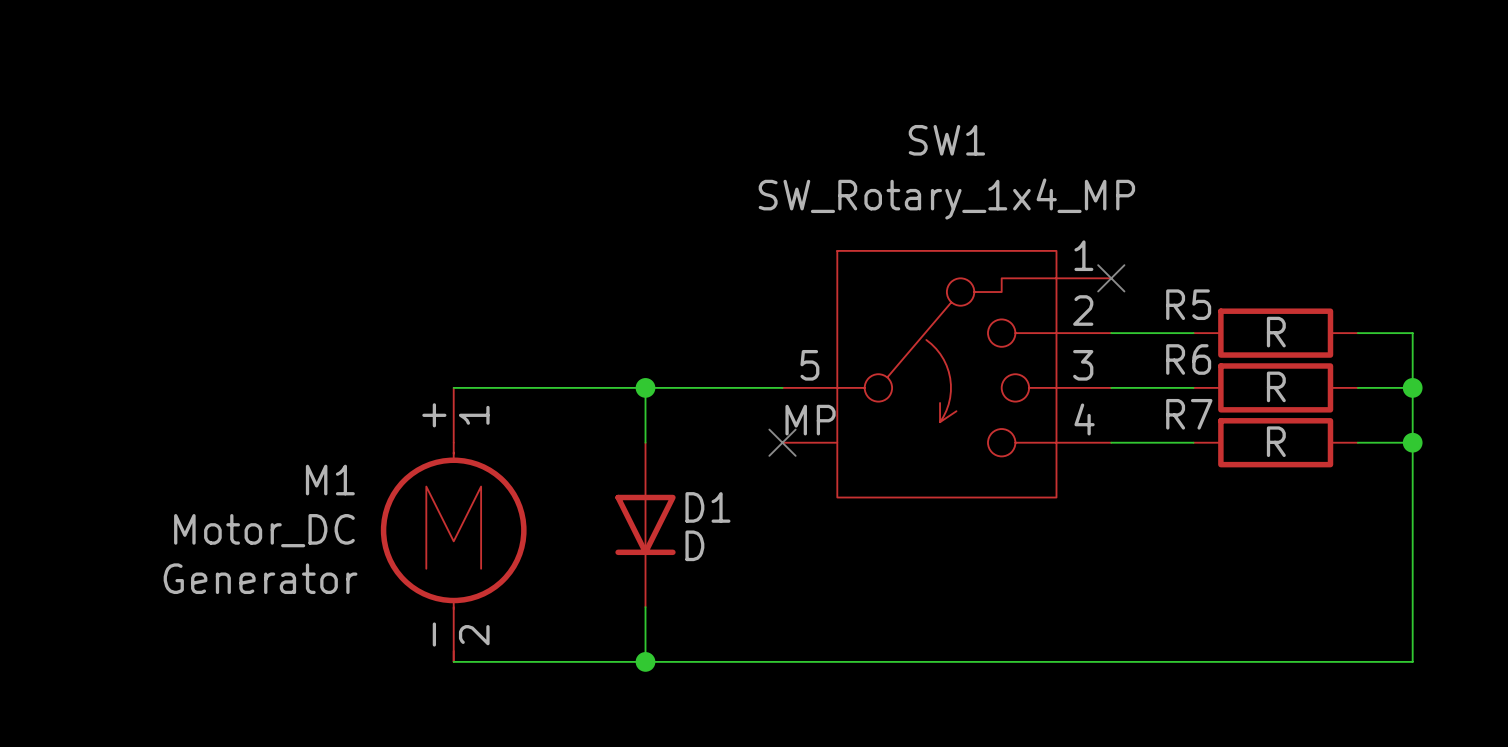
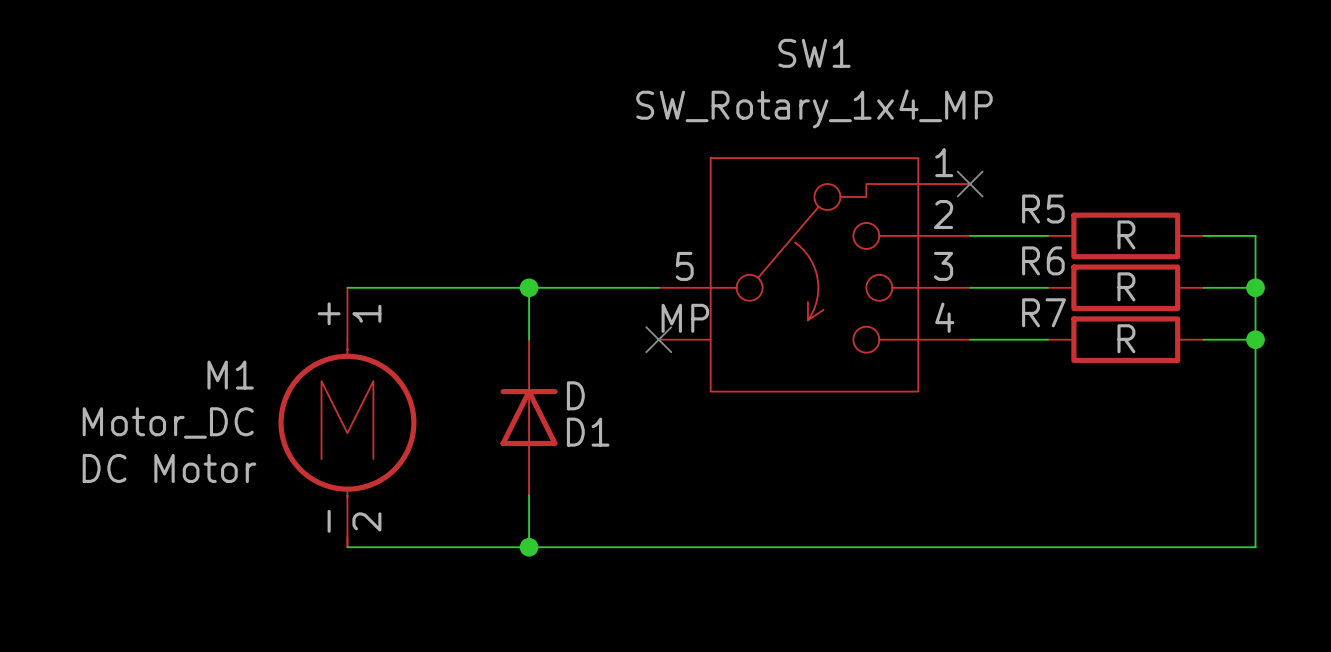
D1 rotation: 0° (645, 524) -> 180° (529, 417)
D1 value position: D (694, 545) -> D (575, 395)
M1 text: Generator (260, 578) -> DC Motor (169, 468)

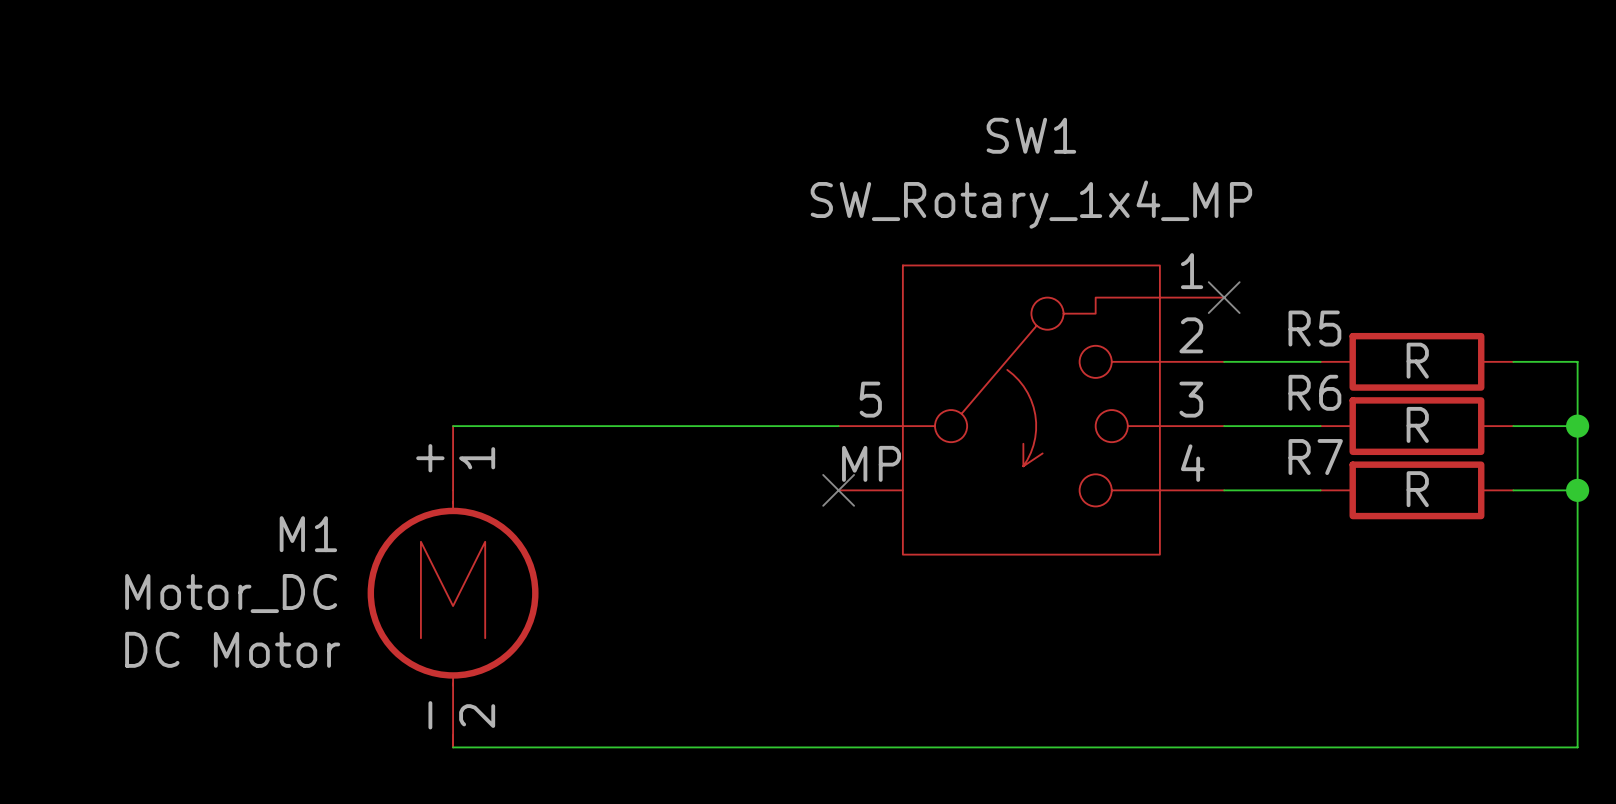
wire: (529, 287) (529, 339) -> none
junction: (529, 287) -> none
D1: D (529, 417) -> none
wire: (529, 495) (529, 547) -> none
junction: (529, 547) -> none

